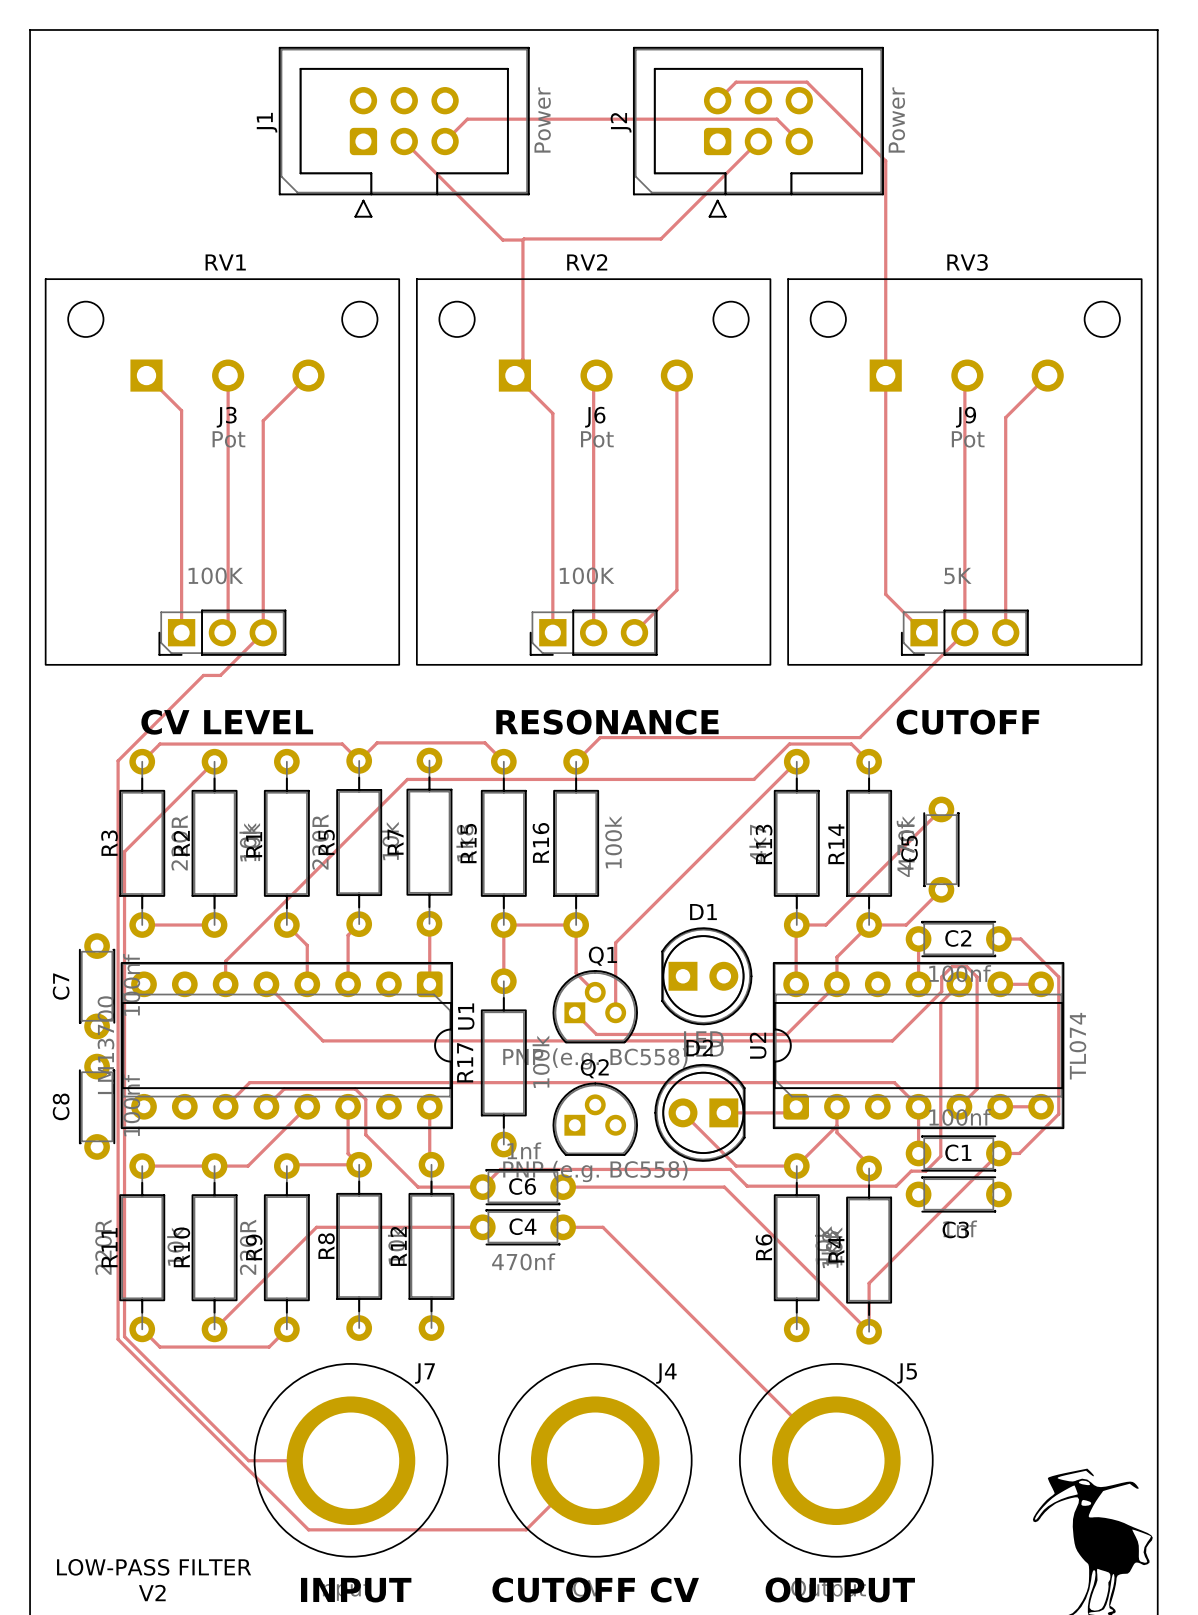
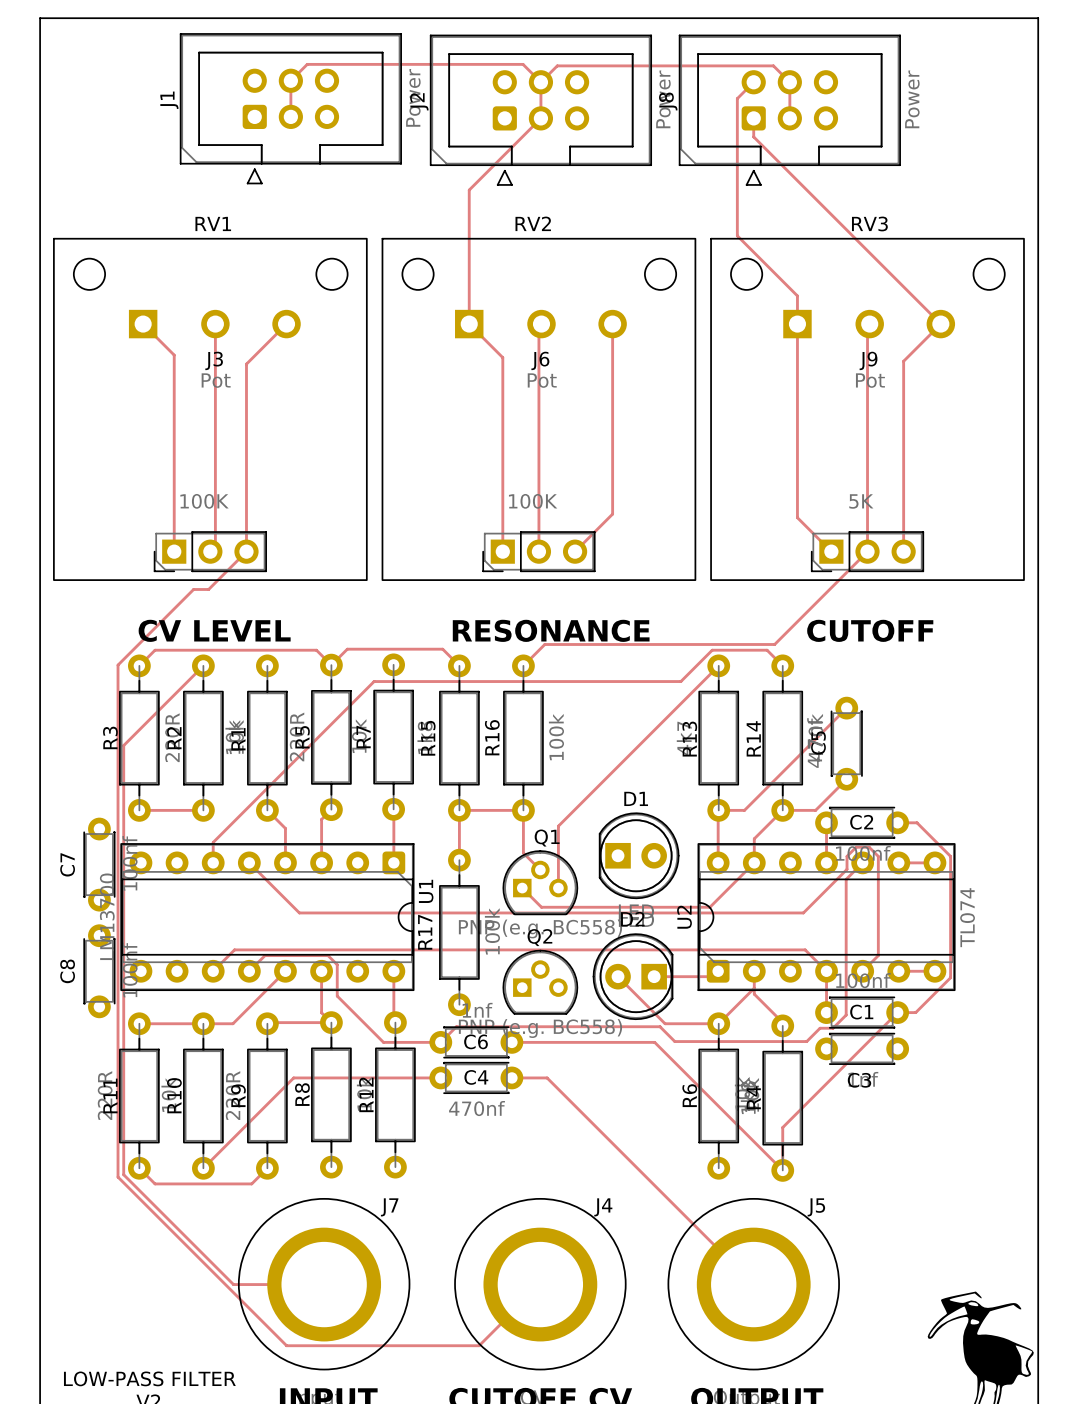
track: (717, 100) (736, 82) (806, 82) (885, 160) (885, 343) -> (753, 82) (737, 98) (737, 235) (797, 295)
track: none -> (540, 82) (557, 65) (773, 65) (789, 82) (789, 118)
track: none -> (540, 82) (523, 64) (307, 64) (290, 80) (290, 116)
J1 position: (404, 132) -> (290, 108)
J2 position: (758, 132) -> (540, 110)
J8: none -> Power (789, 110)
track: (404, 141) (502, 240) (522, 240) -> none
track: (445, 141) (467, 119) (776, 119) (799, 141) -> none
track: (758, 141) (660, 238) (522, 240) -> none
track: none -> (753, 118) (753, 136) (940, 324)
track: (522, 240) (522, 359) (514, 367) -> (540, 82) (540, 118) (469, 190) (469, 316)

